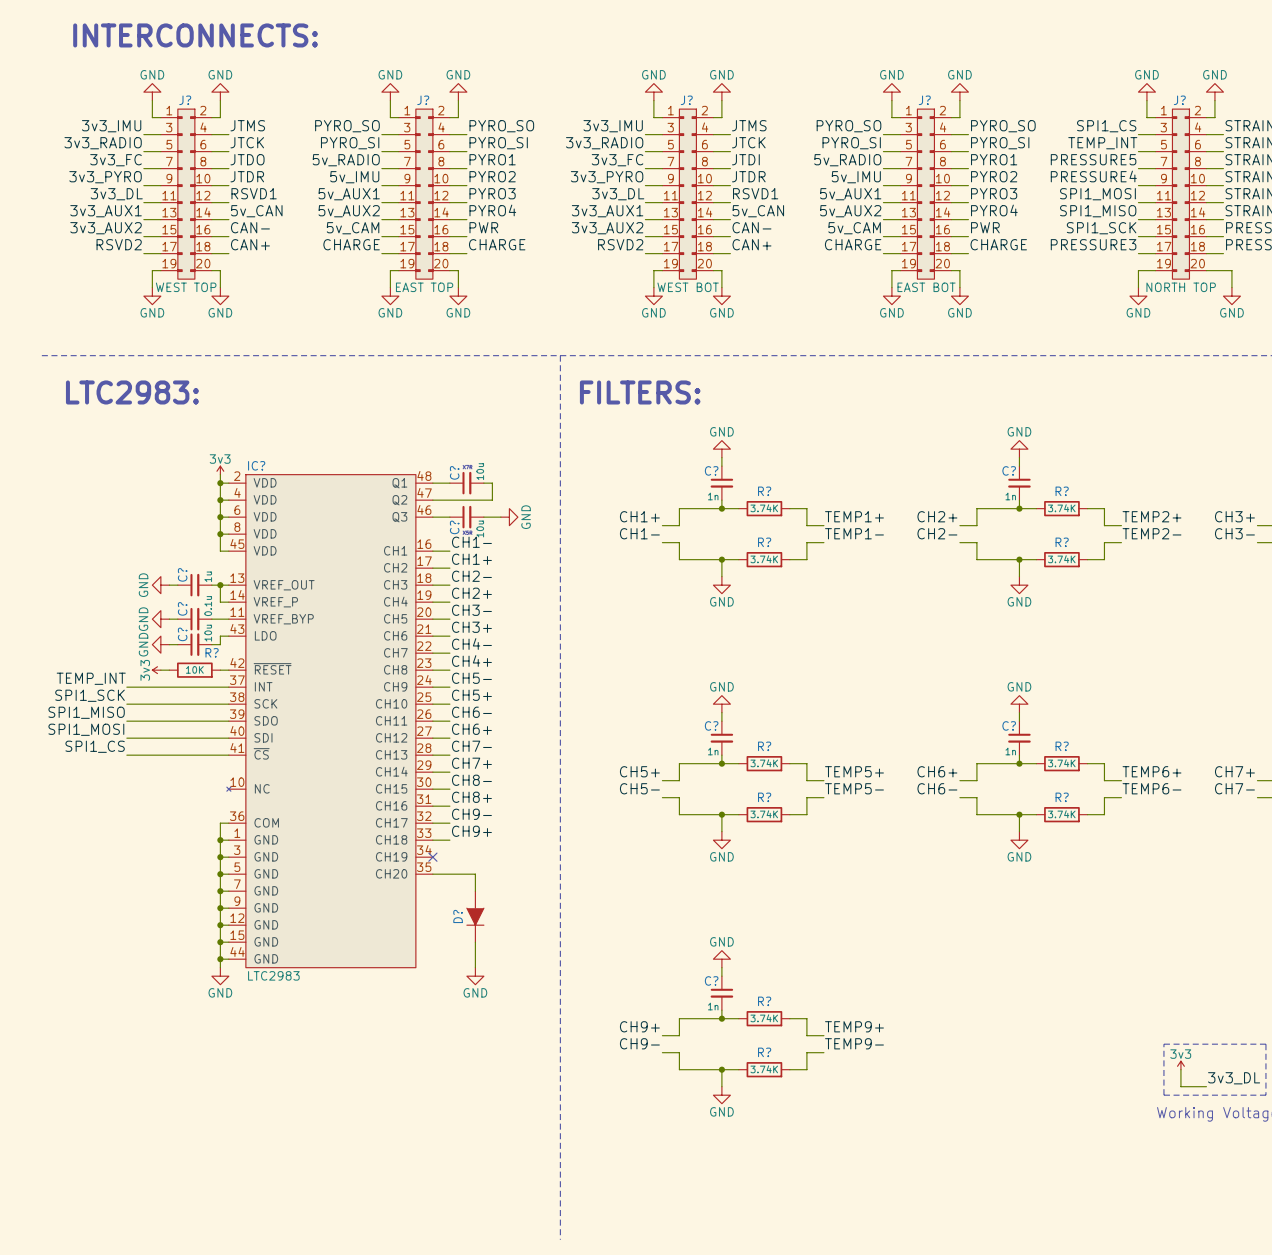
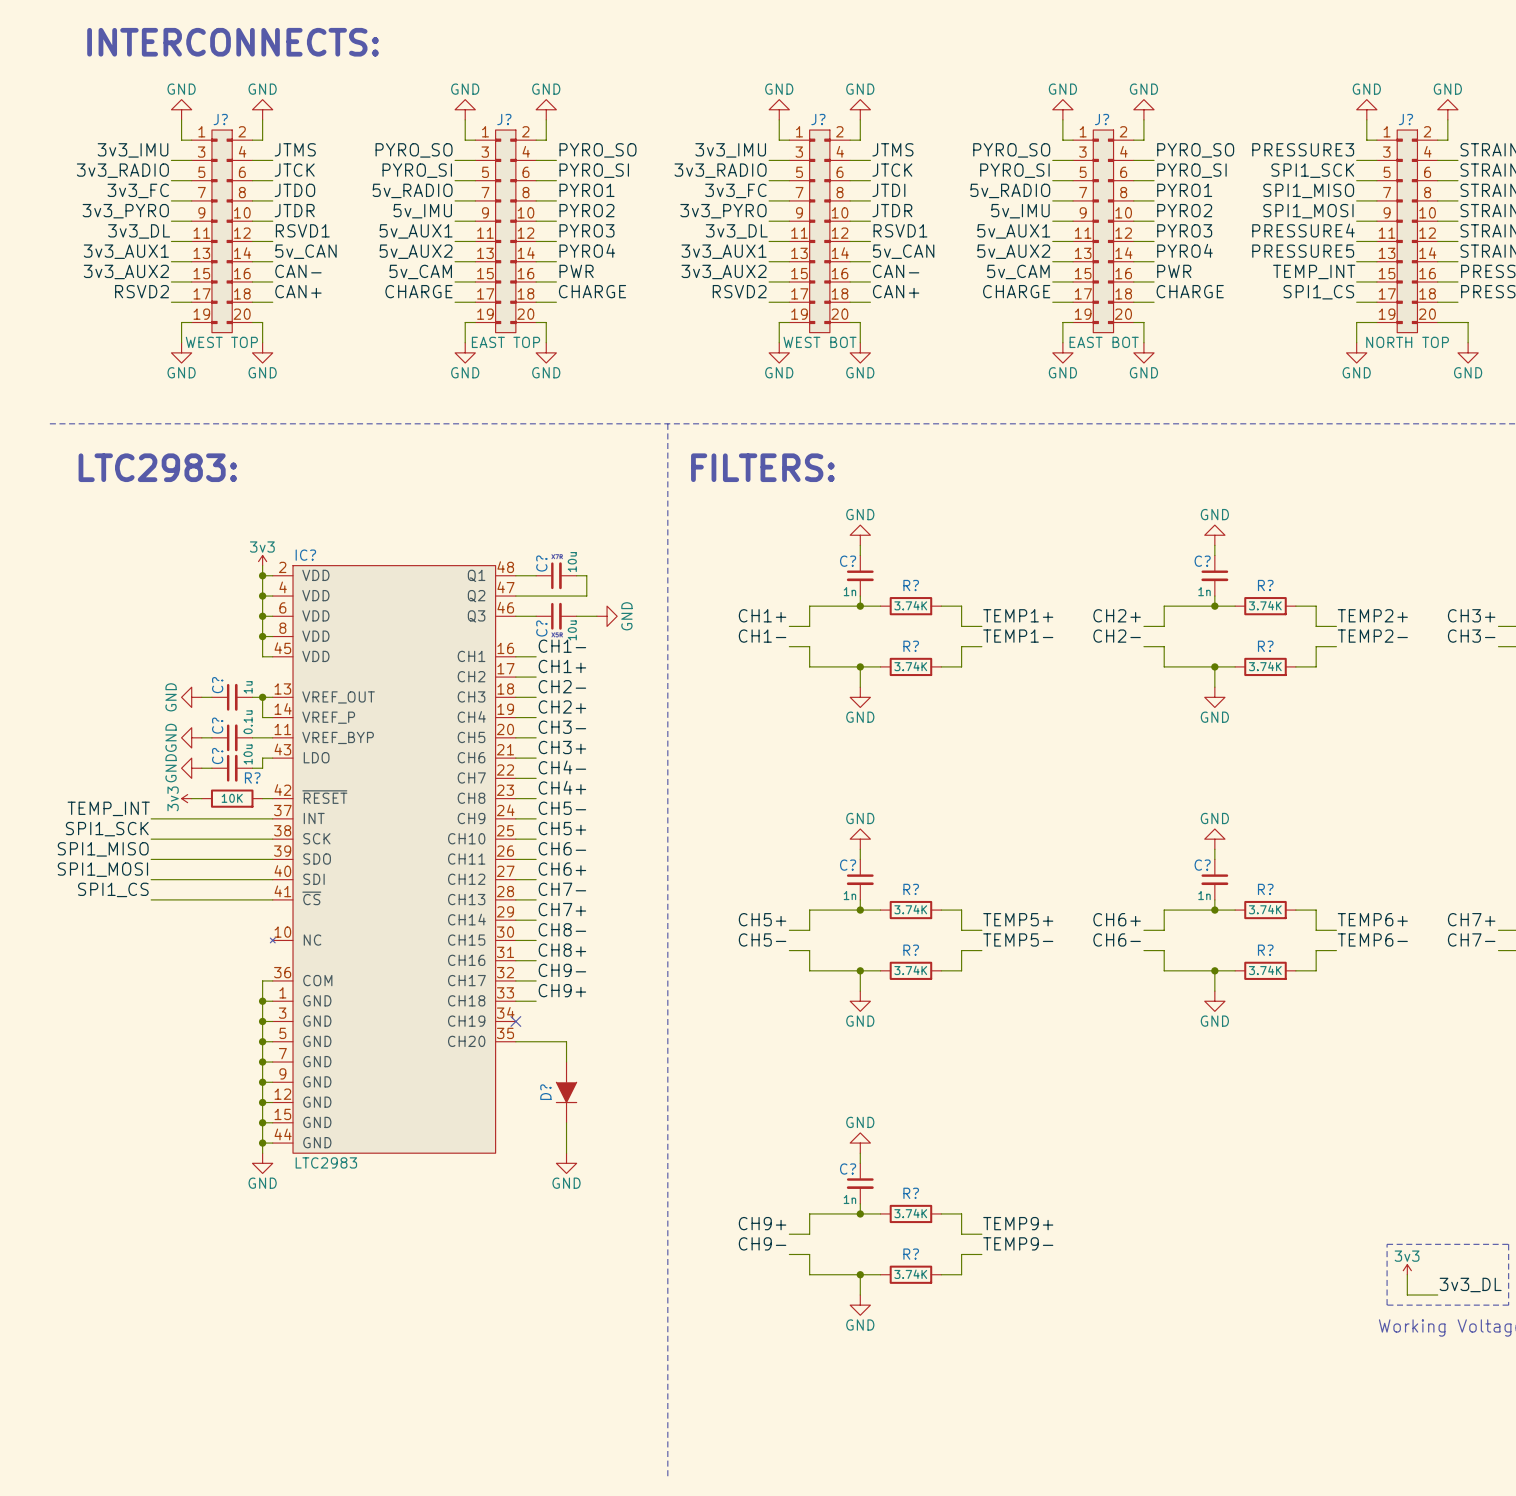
label: SPI1_CS (1106, 126) -> PRESSURE3 (1303, 149)
label: TEMP_INT (1102, 143) -> SPI1_SCK (1312, 170)
label: PRESSURE5 (1093, 159) -> SPI1_MISO (1308, 190)
label: PRESSURE4 (1093, 176) -> SPI1_MOSI (1308, 211)
label: SPI1_MOSI (1097, 194) -> PRESSURE4 (1303, 230)
label: SPI1_MISO (1098, 211) -> PRESSURE5 (1303, 251)
label: SPI1_SCK (1101, 228) -> TEMP_INT (1314, 271)
label: PRESSURE3 (1093, 244) -> SPI1_CS (1318, 292)

